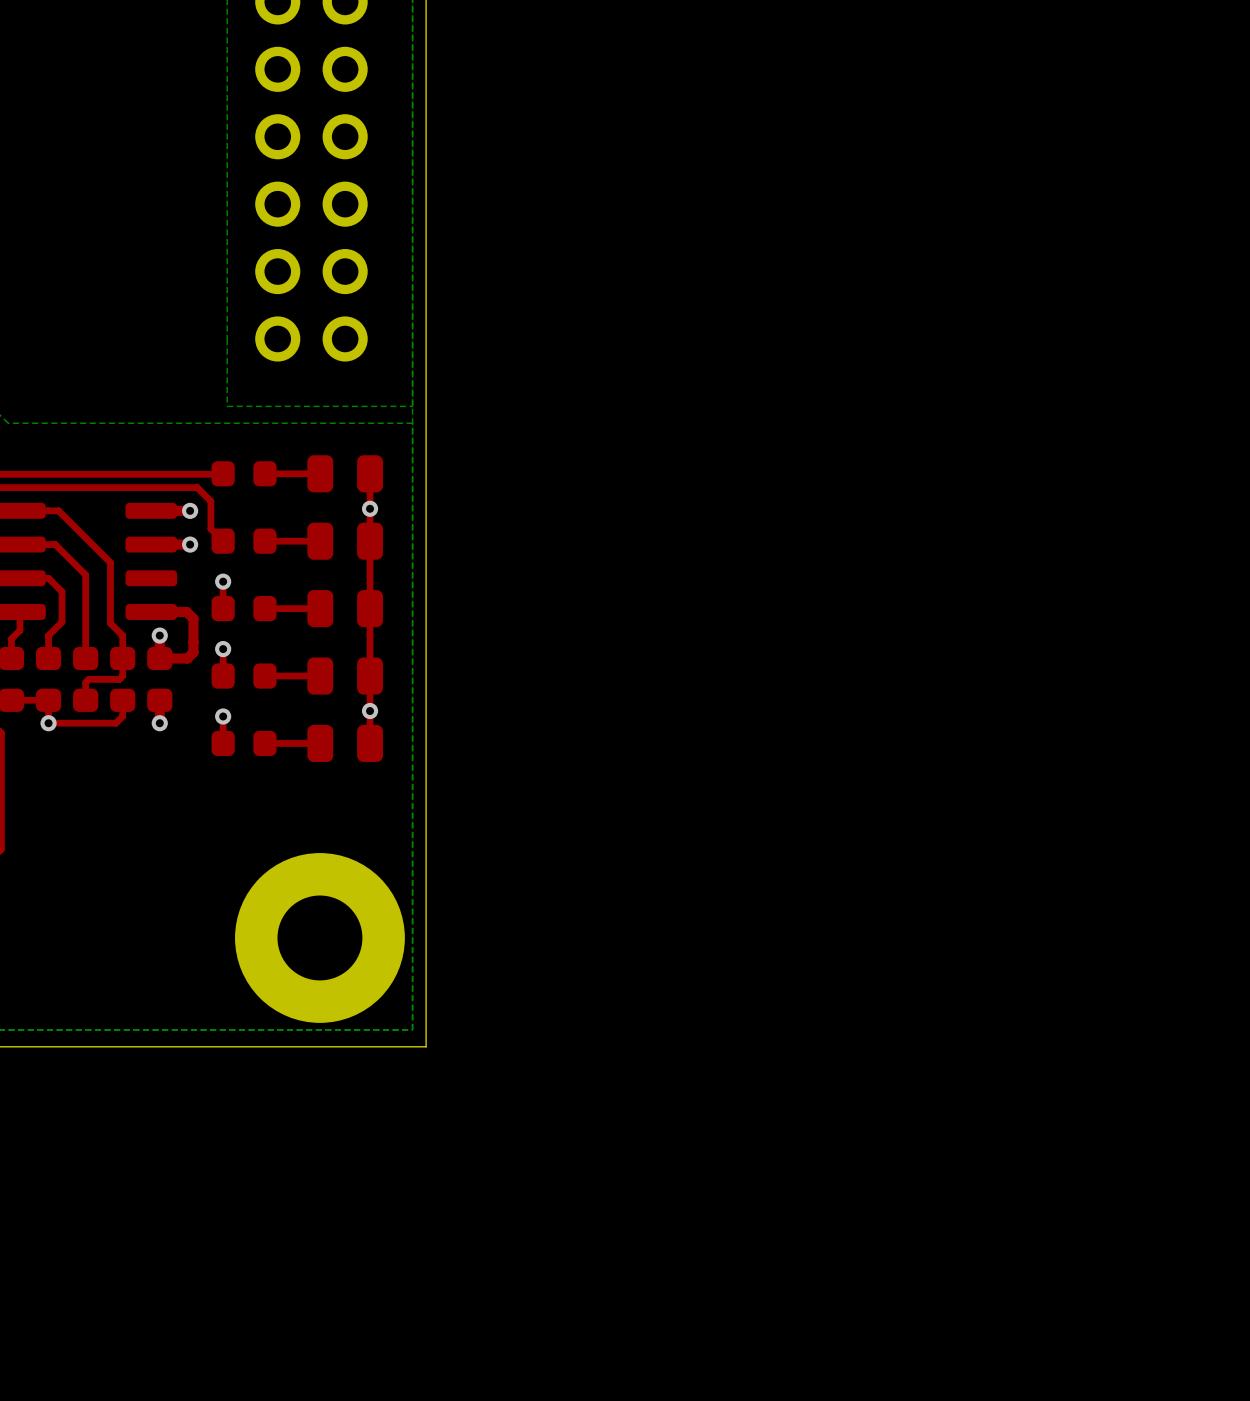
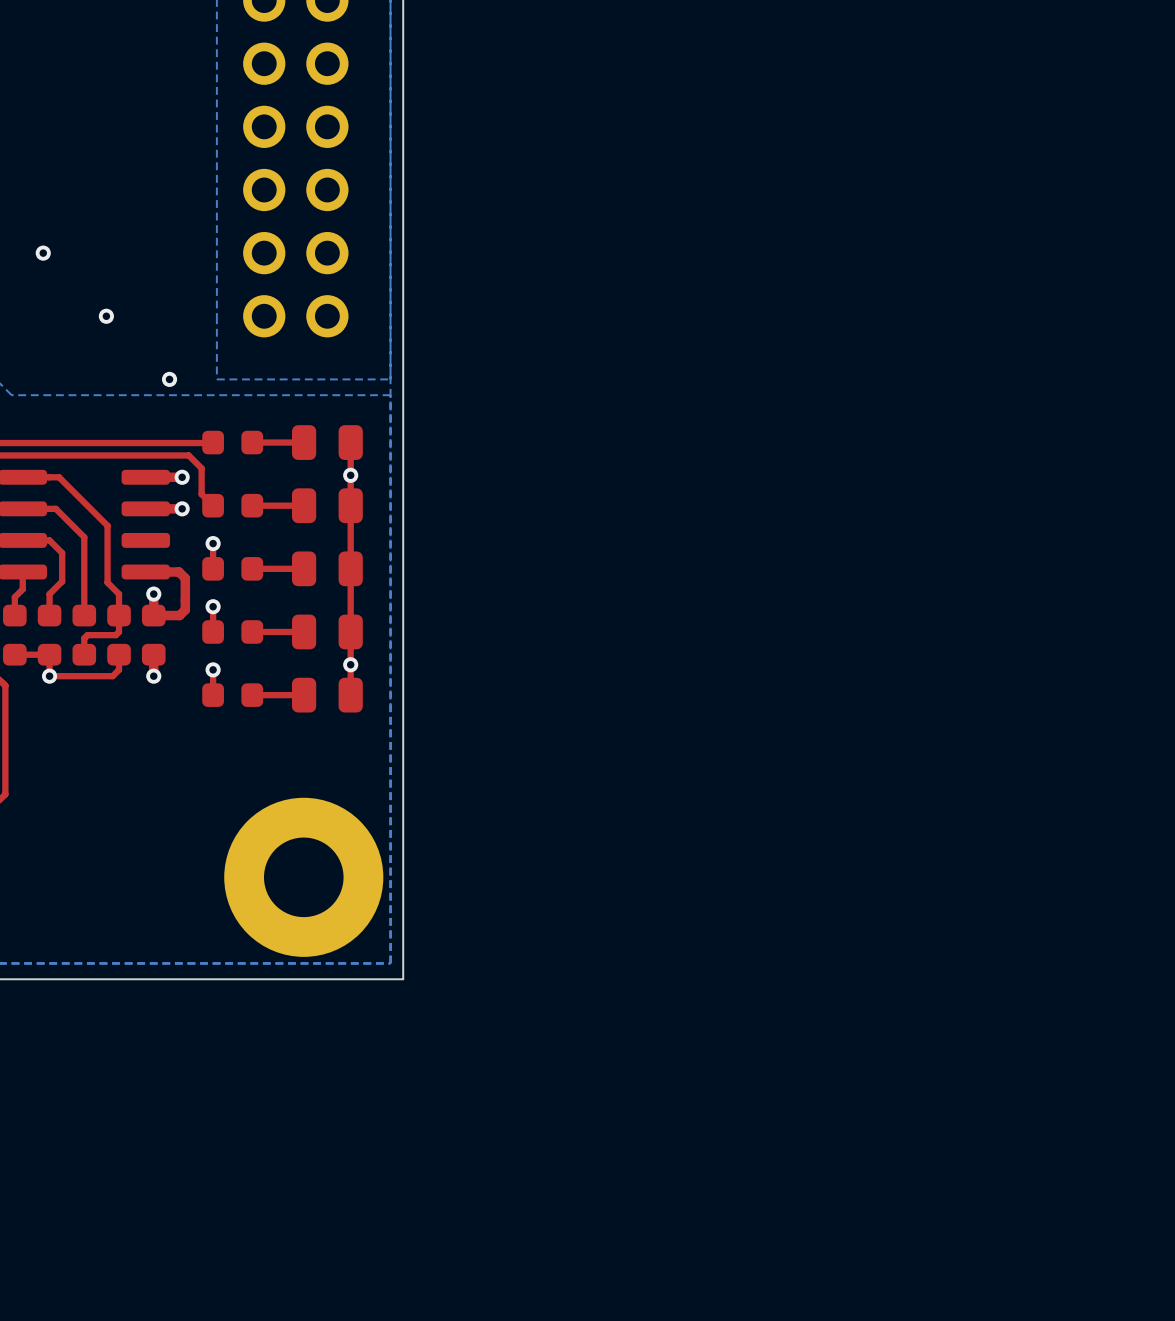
via: none -> (43, 253)
via: none -> (106, 316)
via: none -> (169, 379)

